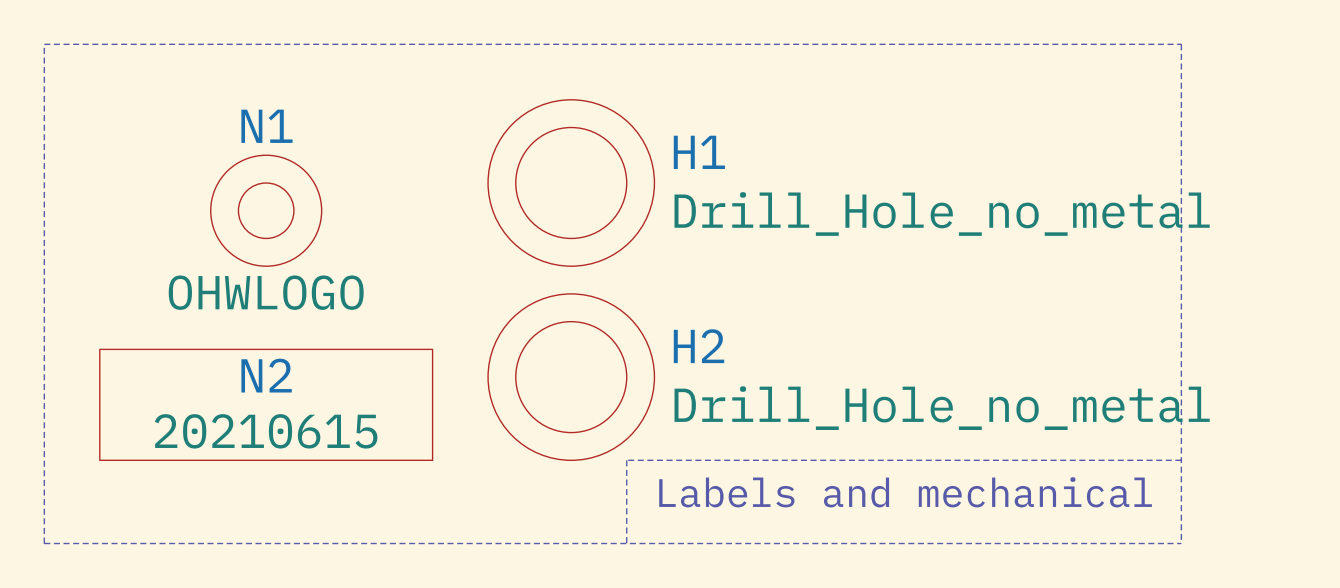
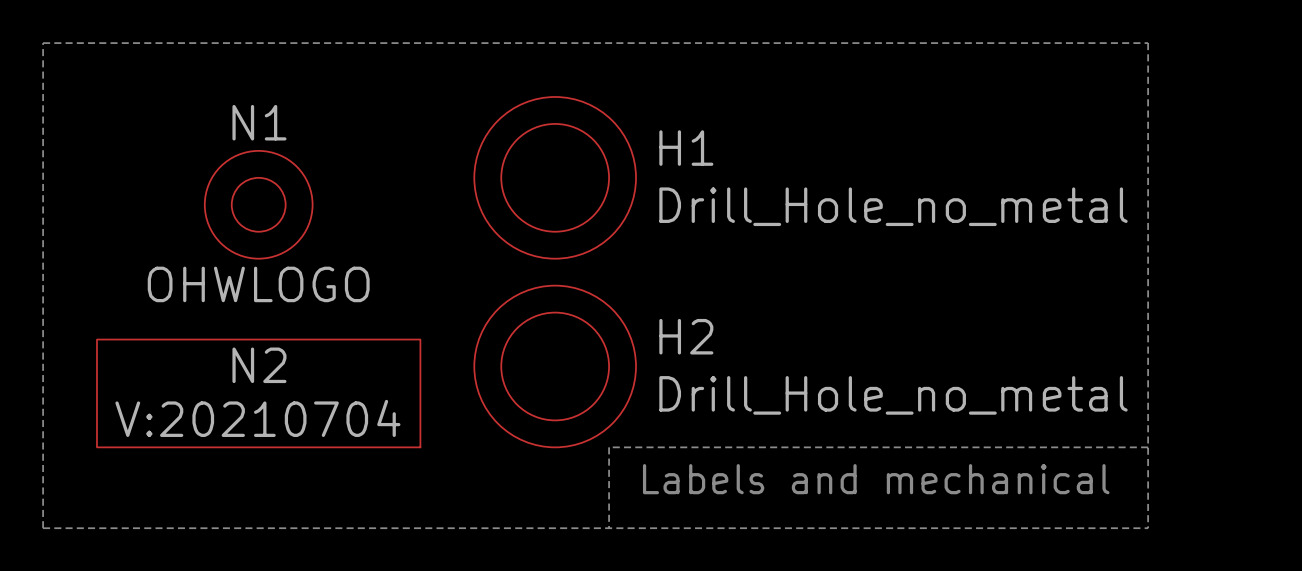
N2 value: 20210615 (266, 431) -> V:20210704 (257, 418)

